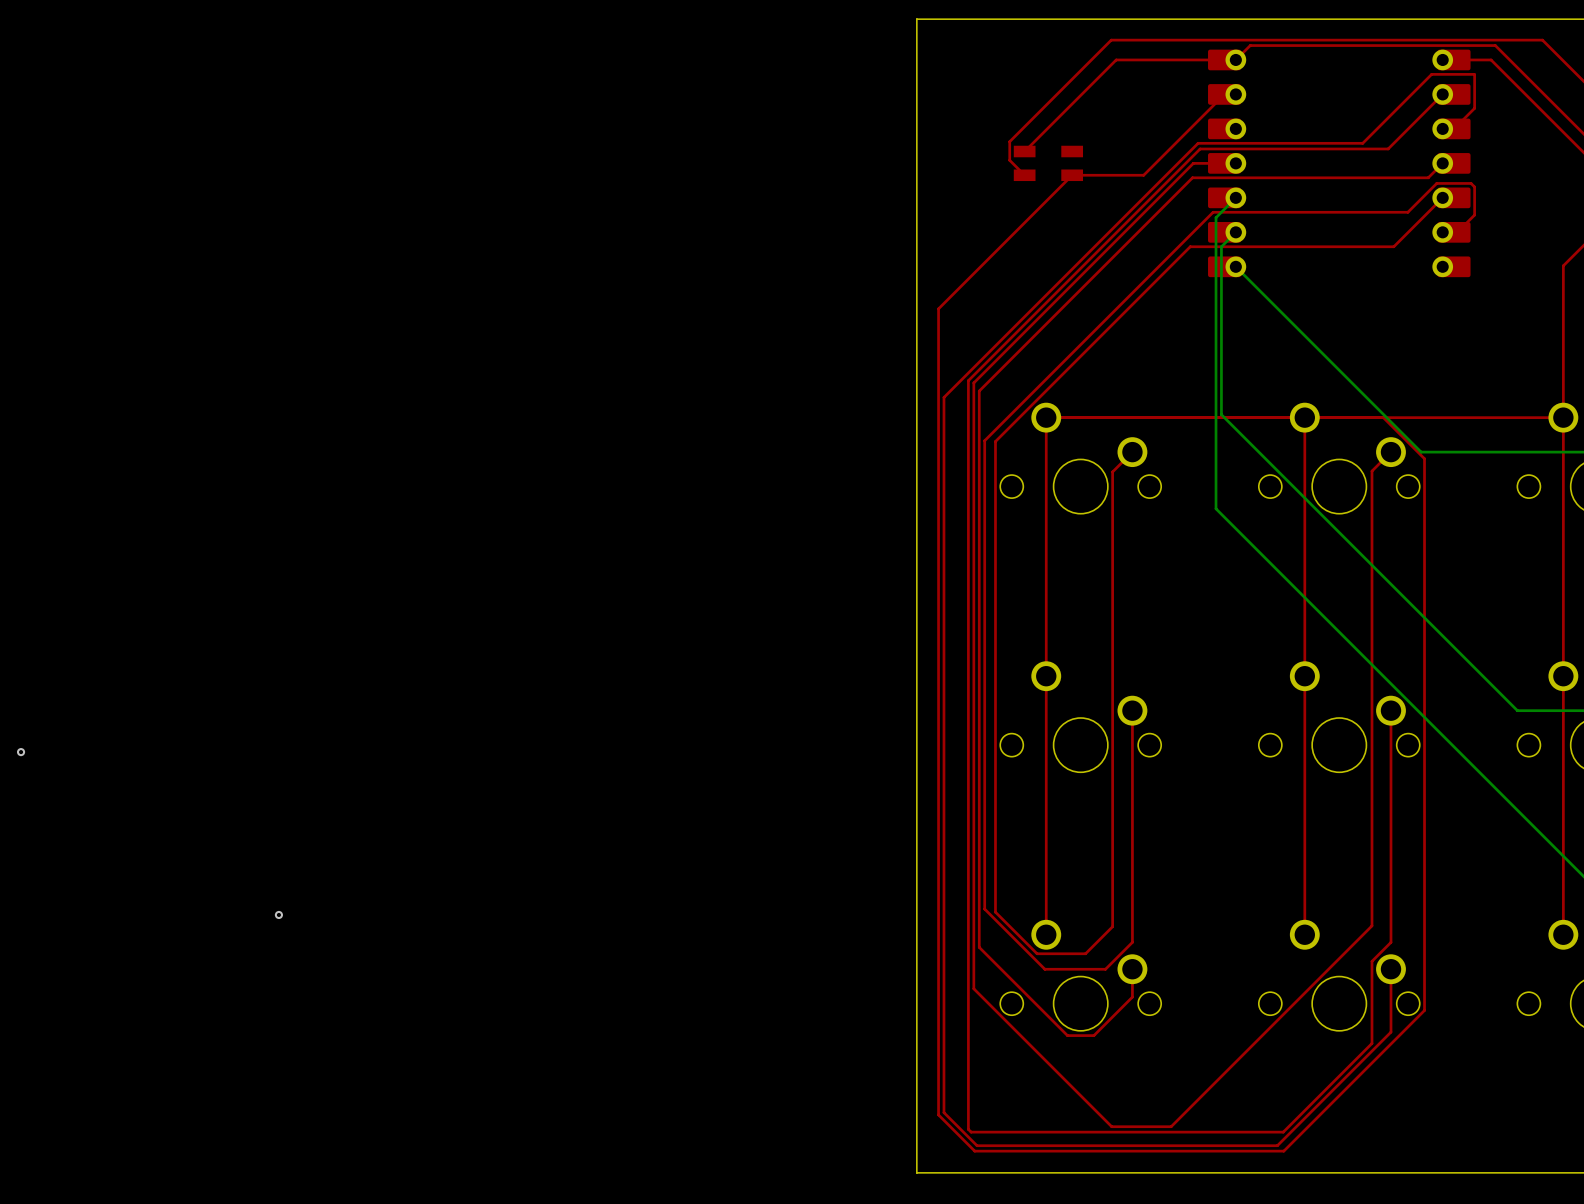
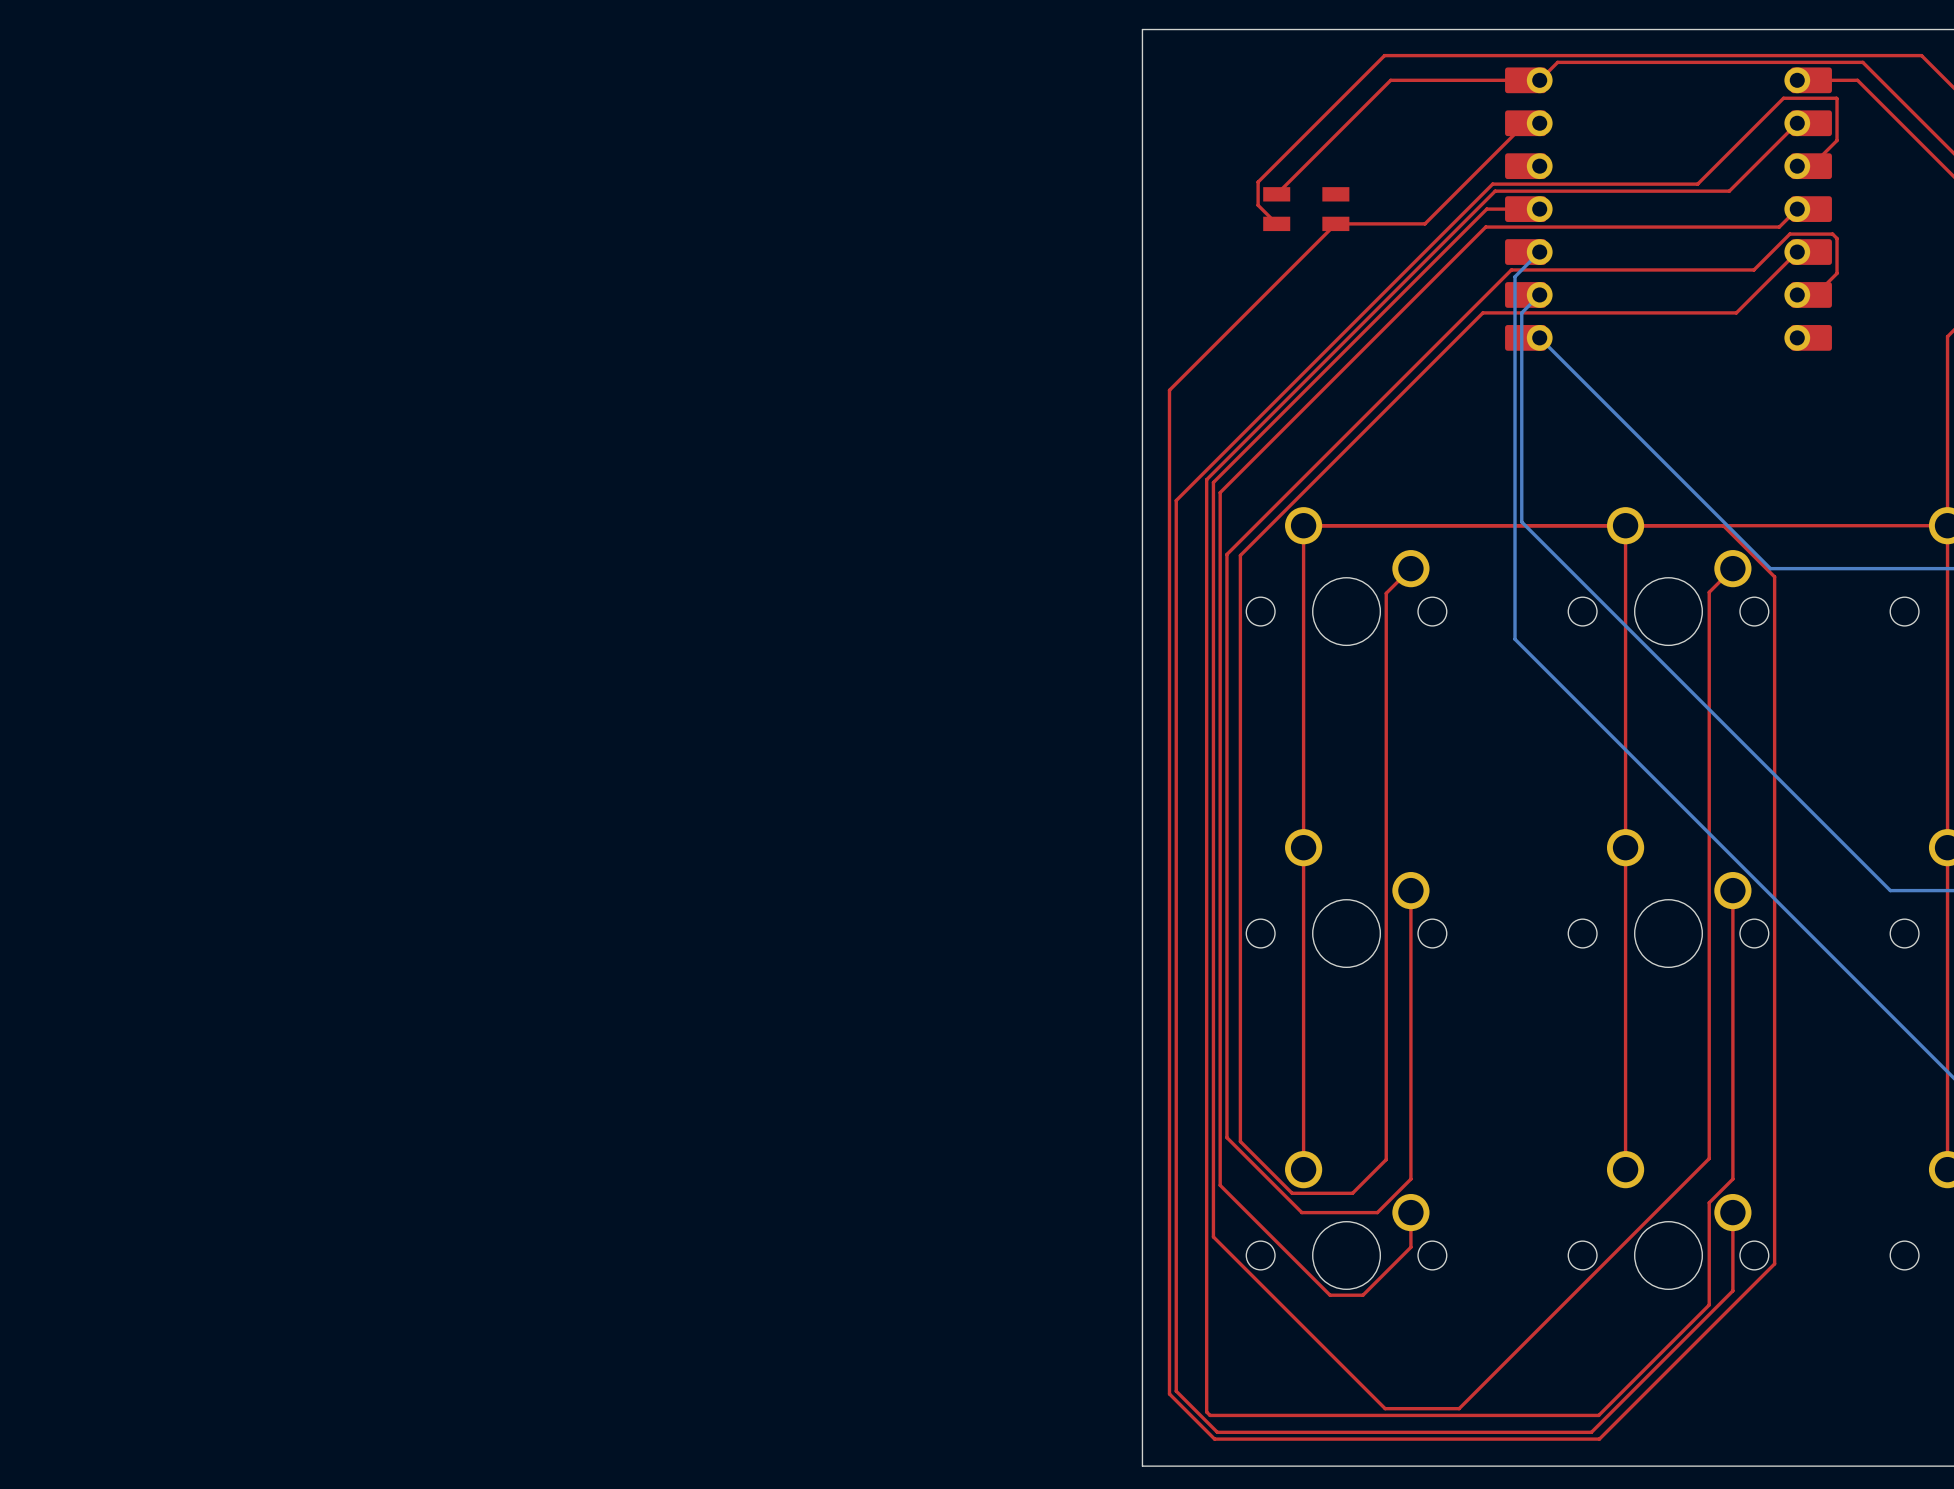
via: (21, 752) -> none
via: (278, 914) -> none

